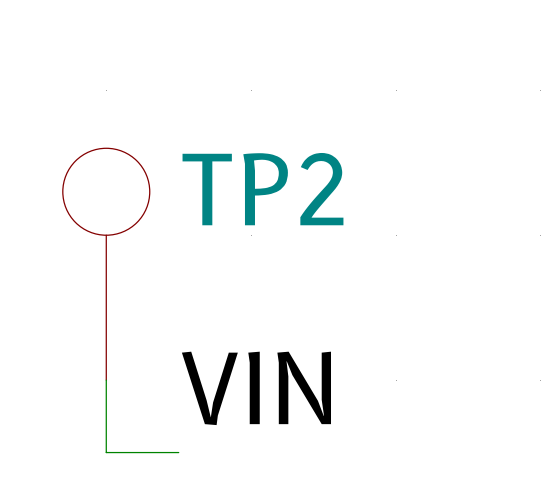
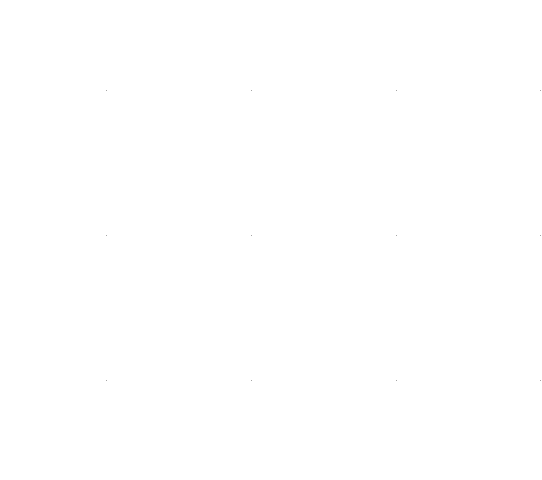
TP2: (106, 264) -> none
wire: (106, 380) (106, 452) (178, 452) -> none
label: VIN (256, 388) -> none

